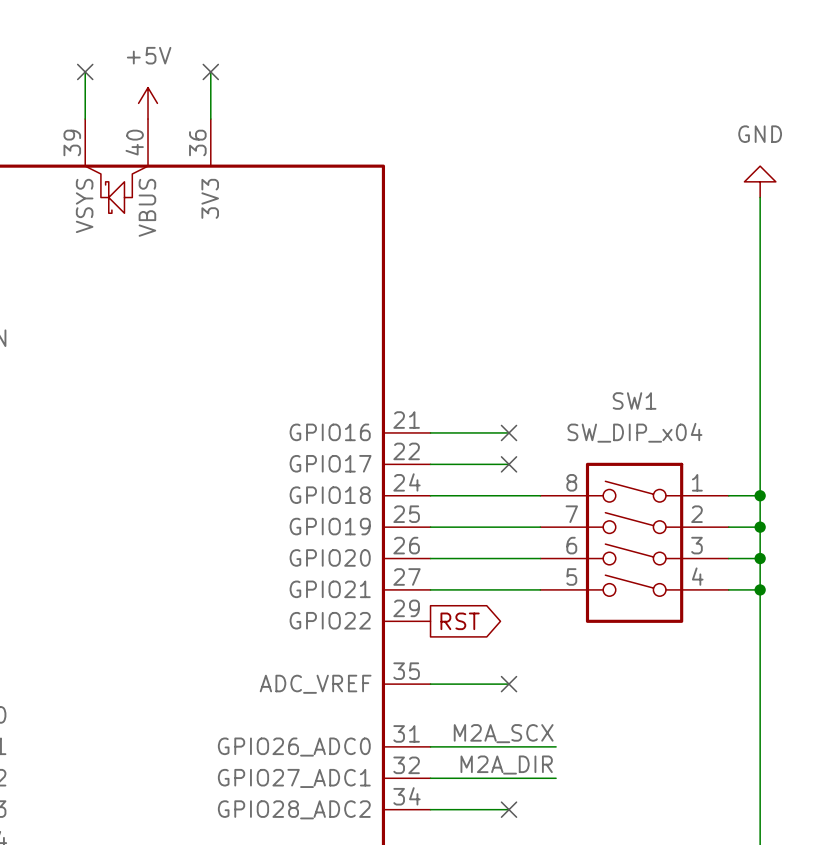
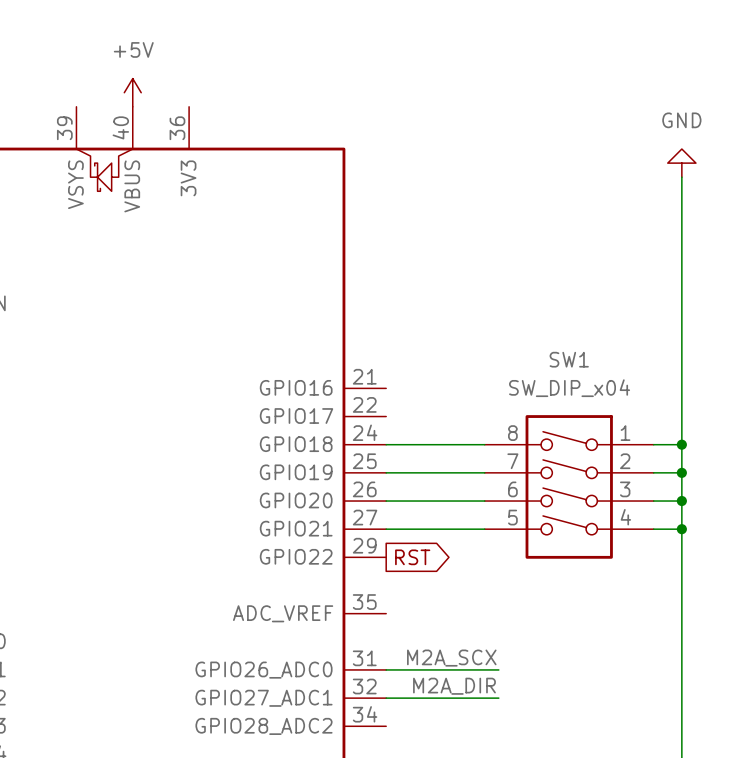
wire: (85, 71) (85, 119) -> none
no-connect mark: (85, 71) -> none
wire: (210, 71) (210, 119) -> none
no-connect mark: (210, 71) -> none
wire: (430, 432) (509, 432) -> none
no-connect mark: (509, 432) -> none
wire: (430, 464) (509, 464) -> none
no-connect mark: (509, 464) -> none
wire: (430, 684) (509, 684) -> none
no-connect mark: (509, 684) -> none
wire: (430, 809) (509, 809) -> none
no-connect mark: (509, 809) -> none

